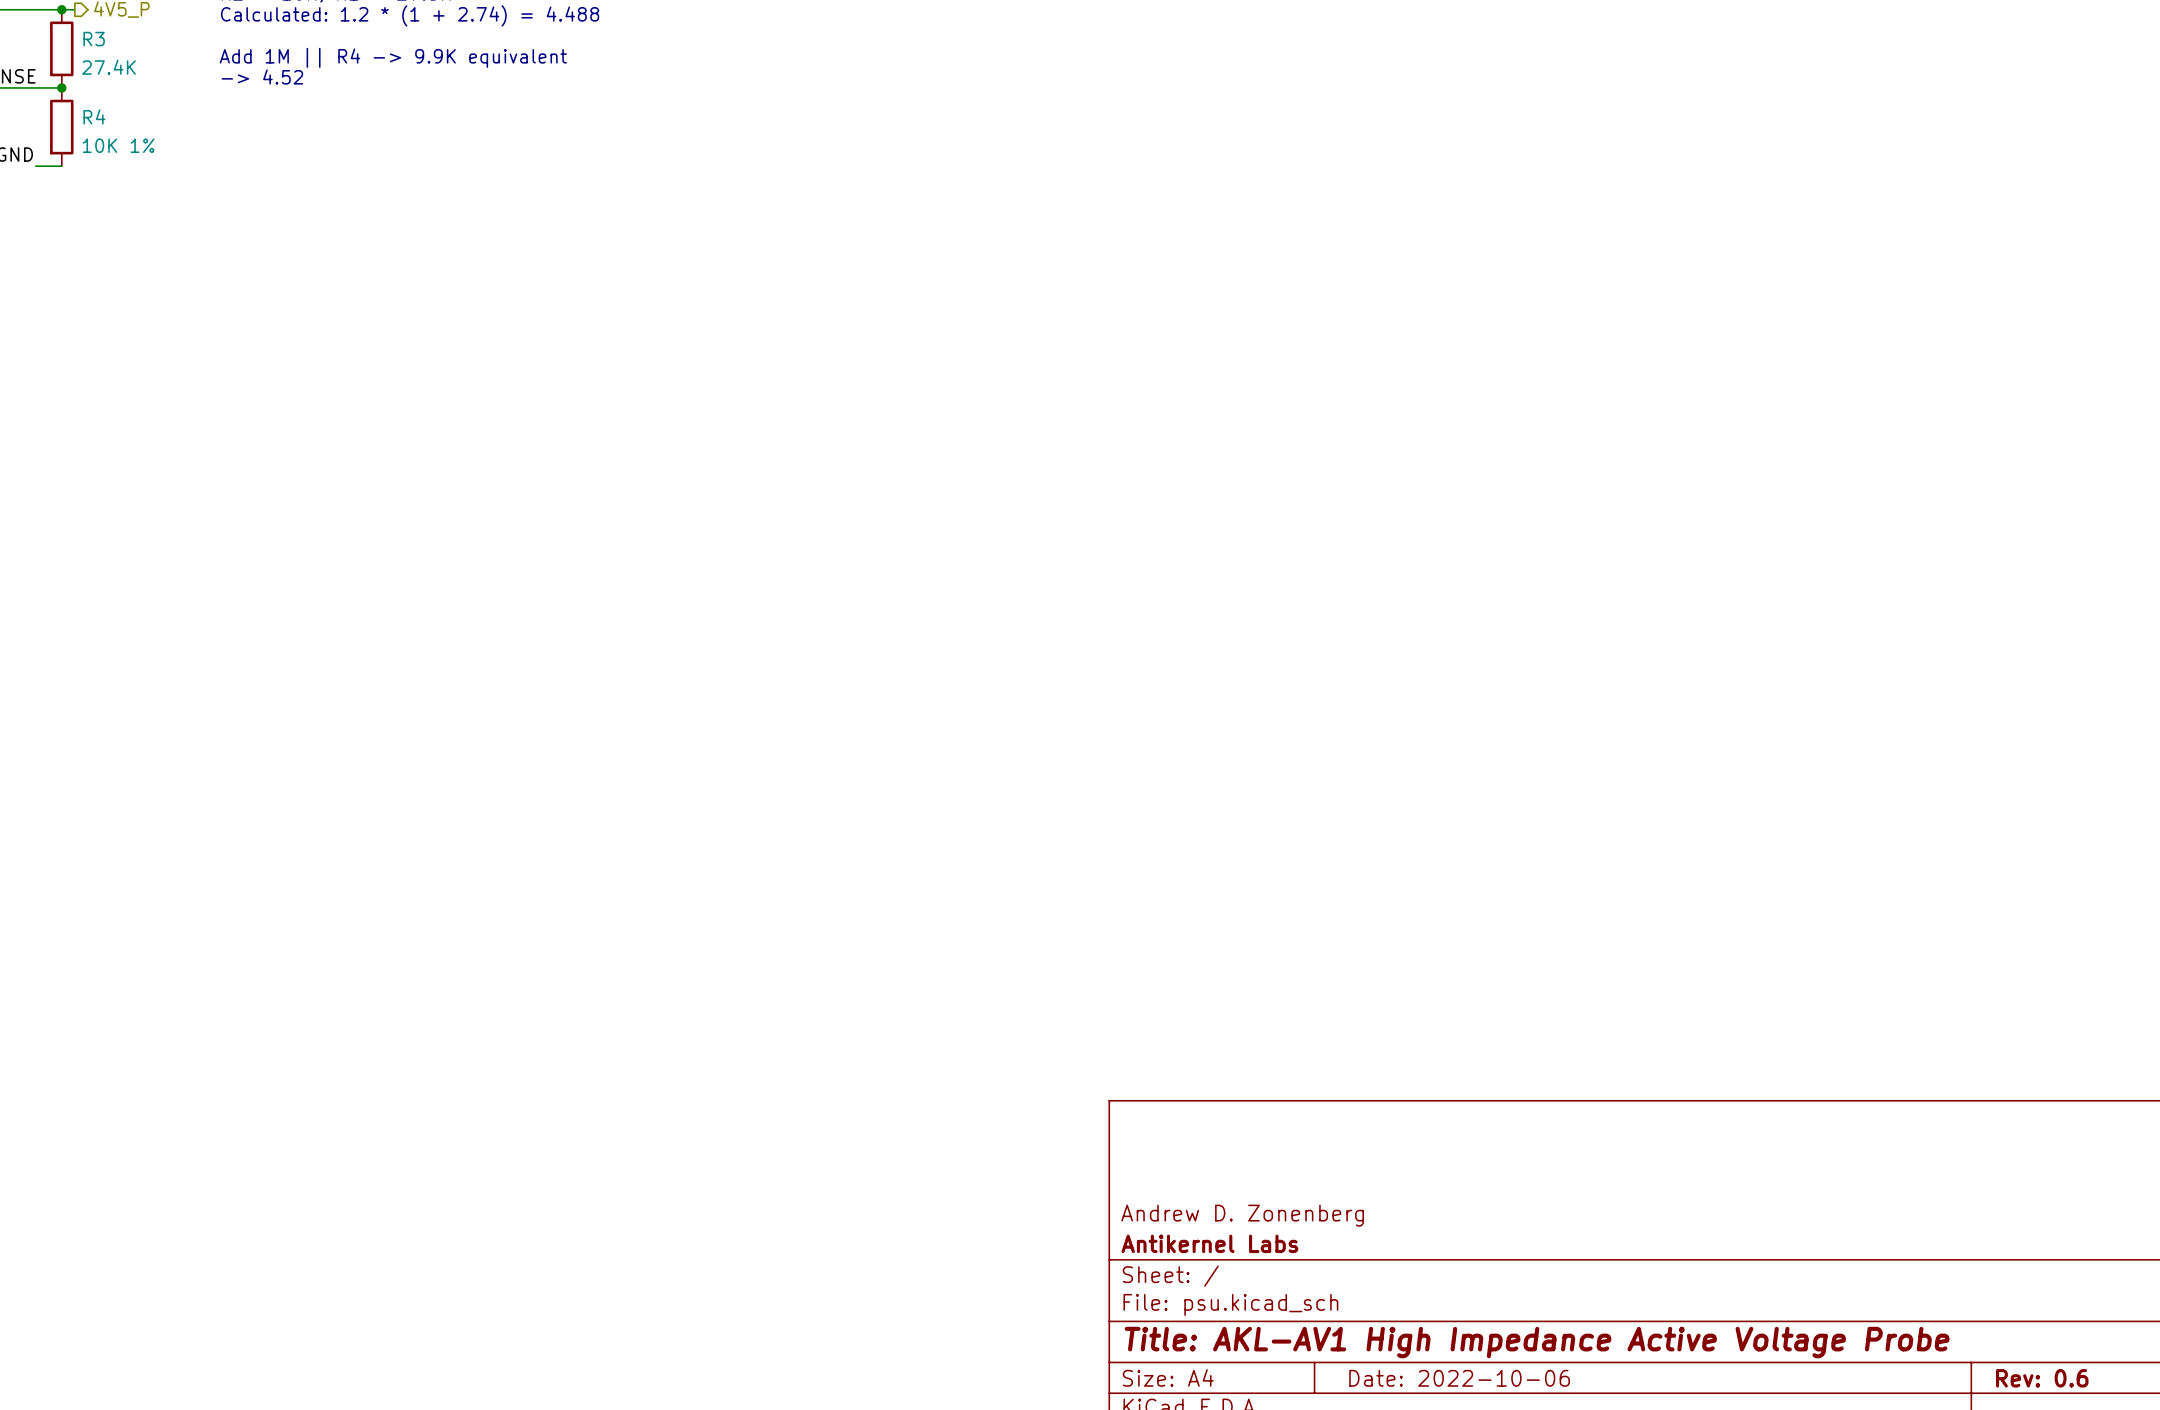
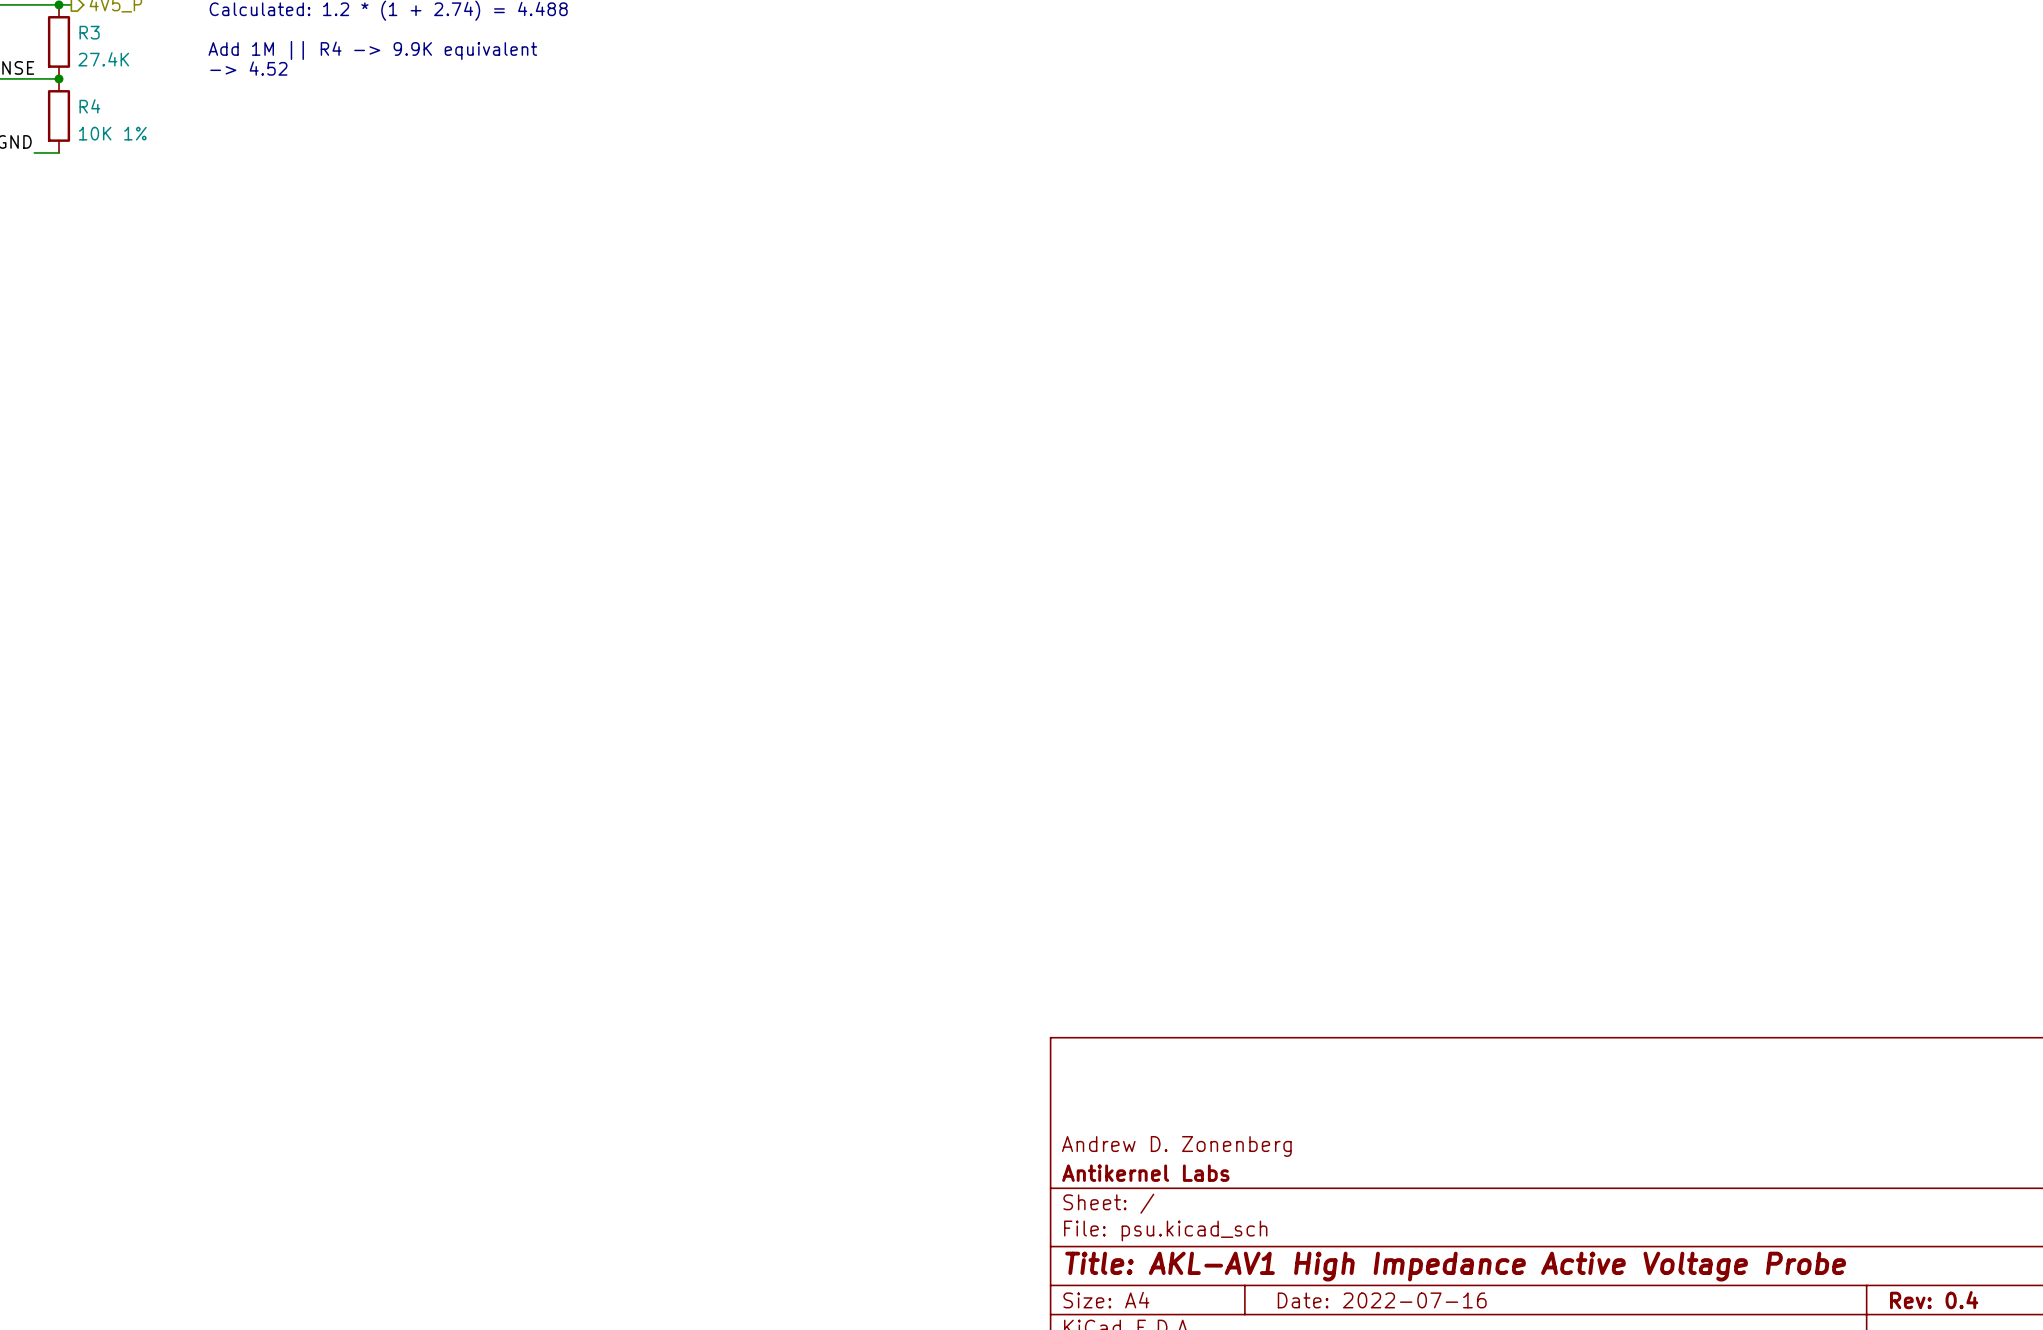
title block: Date: 2022-10-06 (1459, 1378) -> Date: 2022-07-16 (1382, 1300)
title block: Rev: 0.6 (2042, 1378) -> Rev: 0.4 (1934, 1300)

